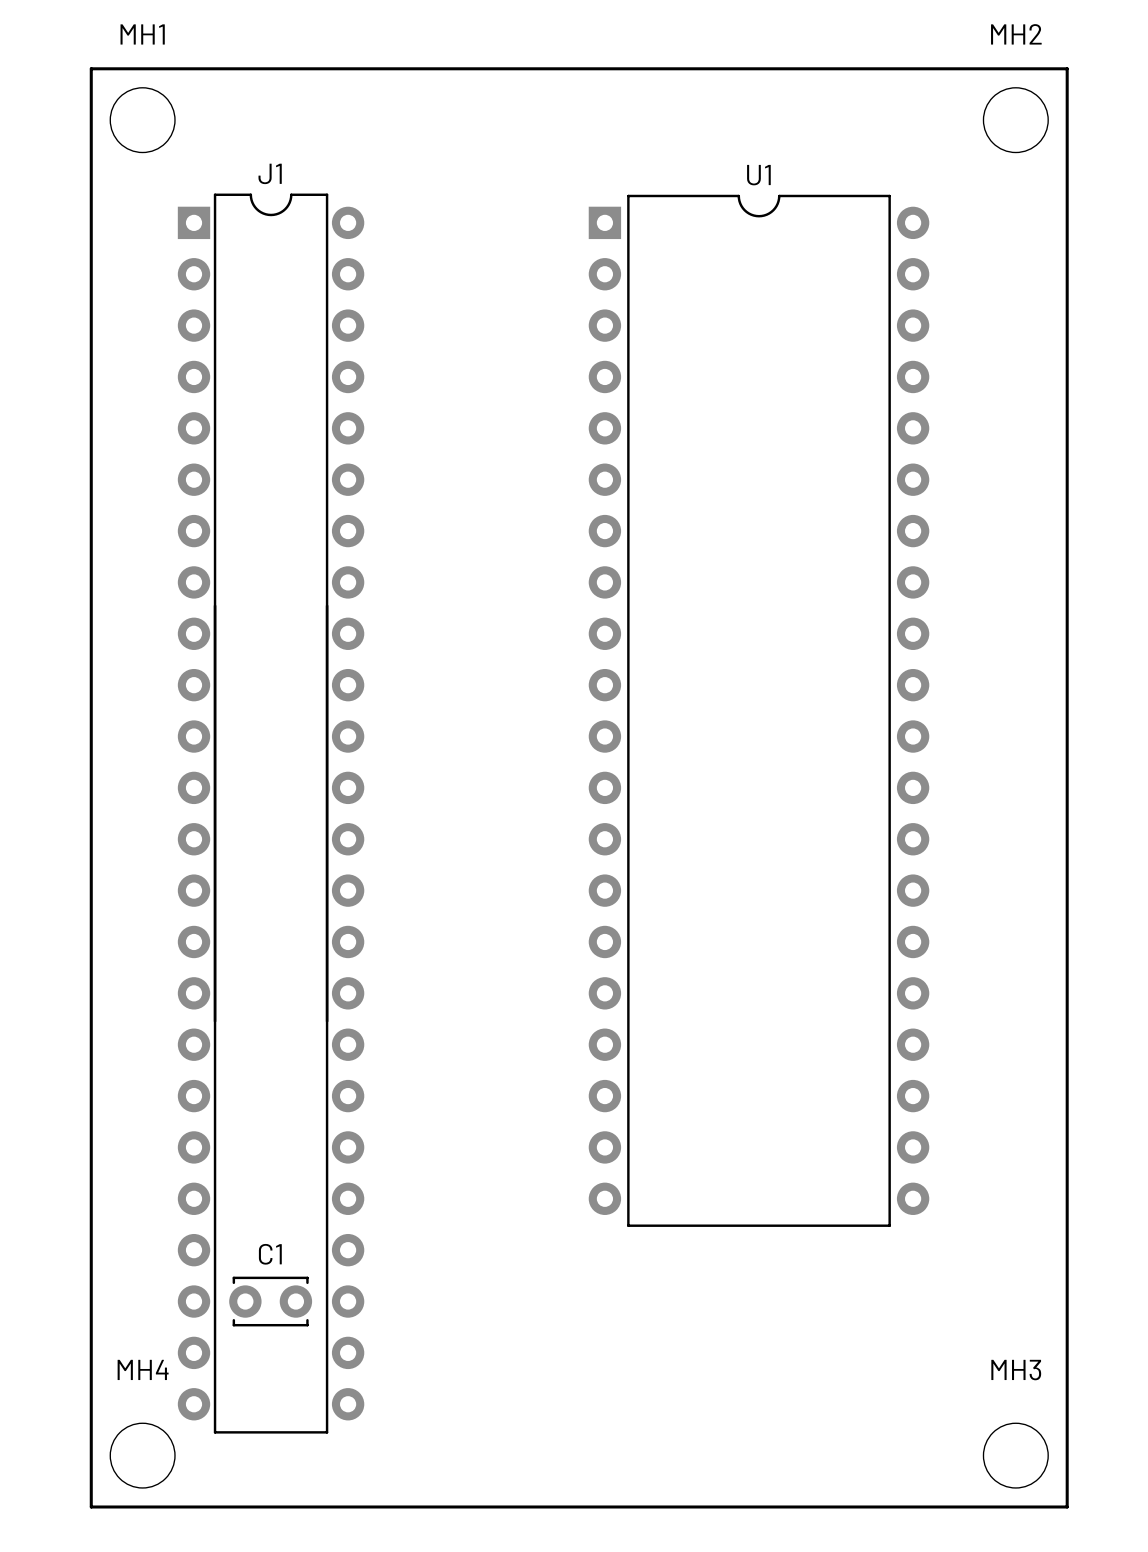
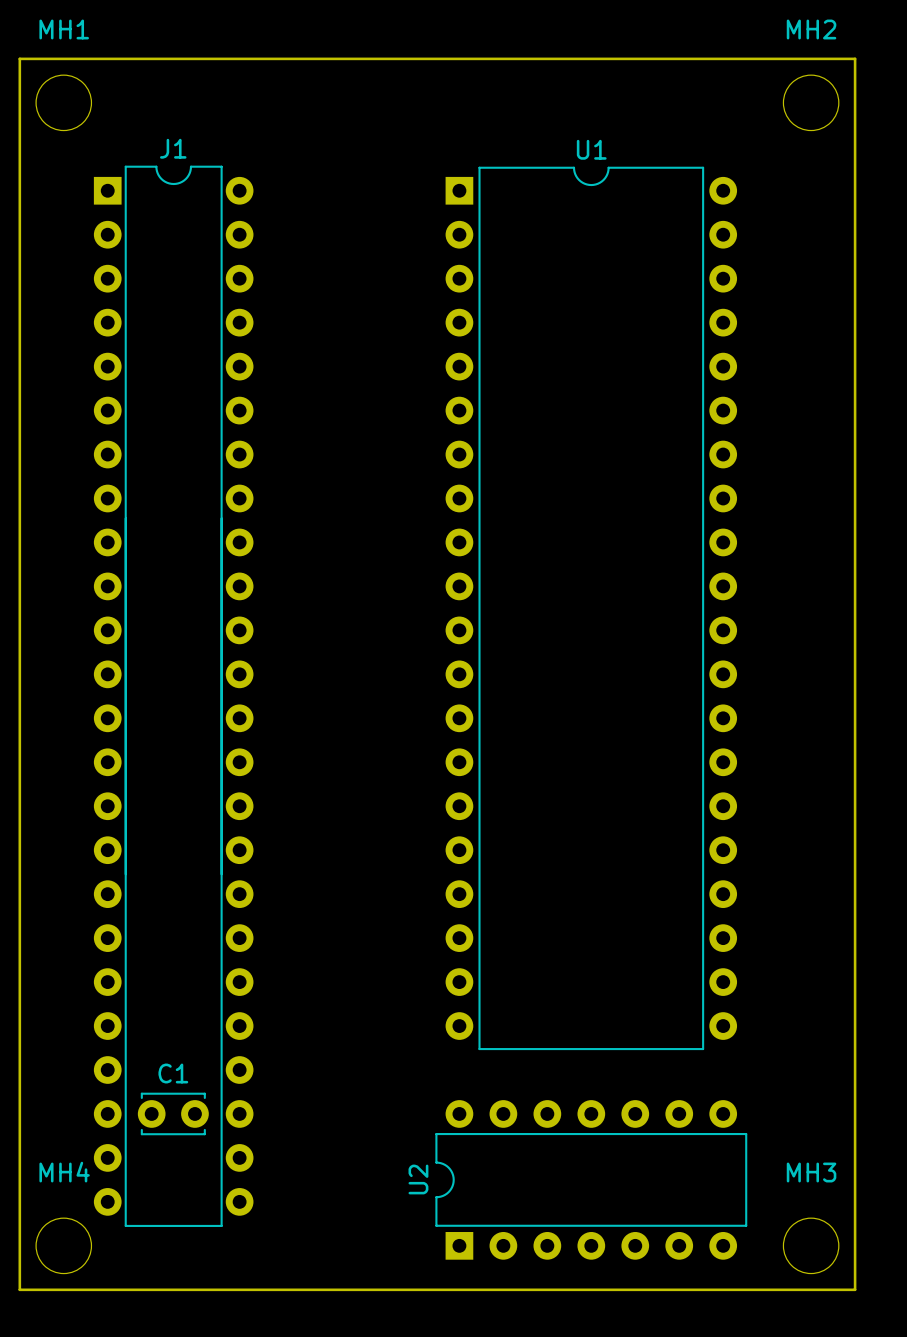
U2: none -> (591, 1179)

